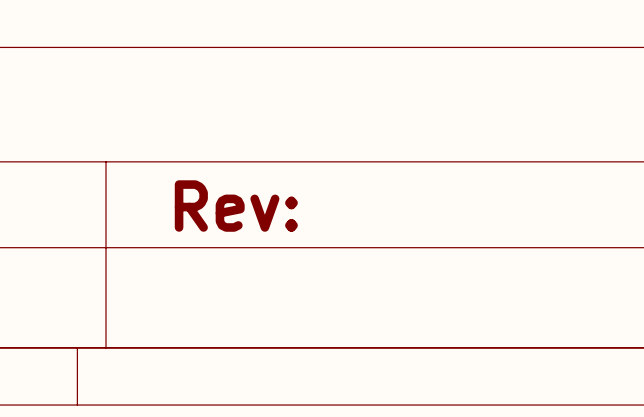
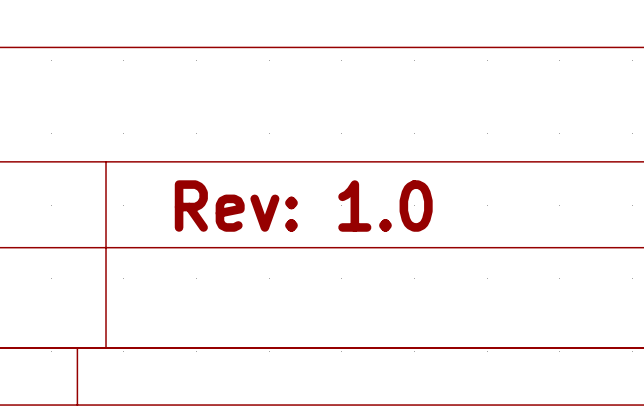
title block: Rev: (236, 206) -> Rev: 1.0 (303, 206)

